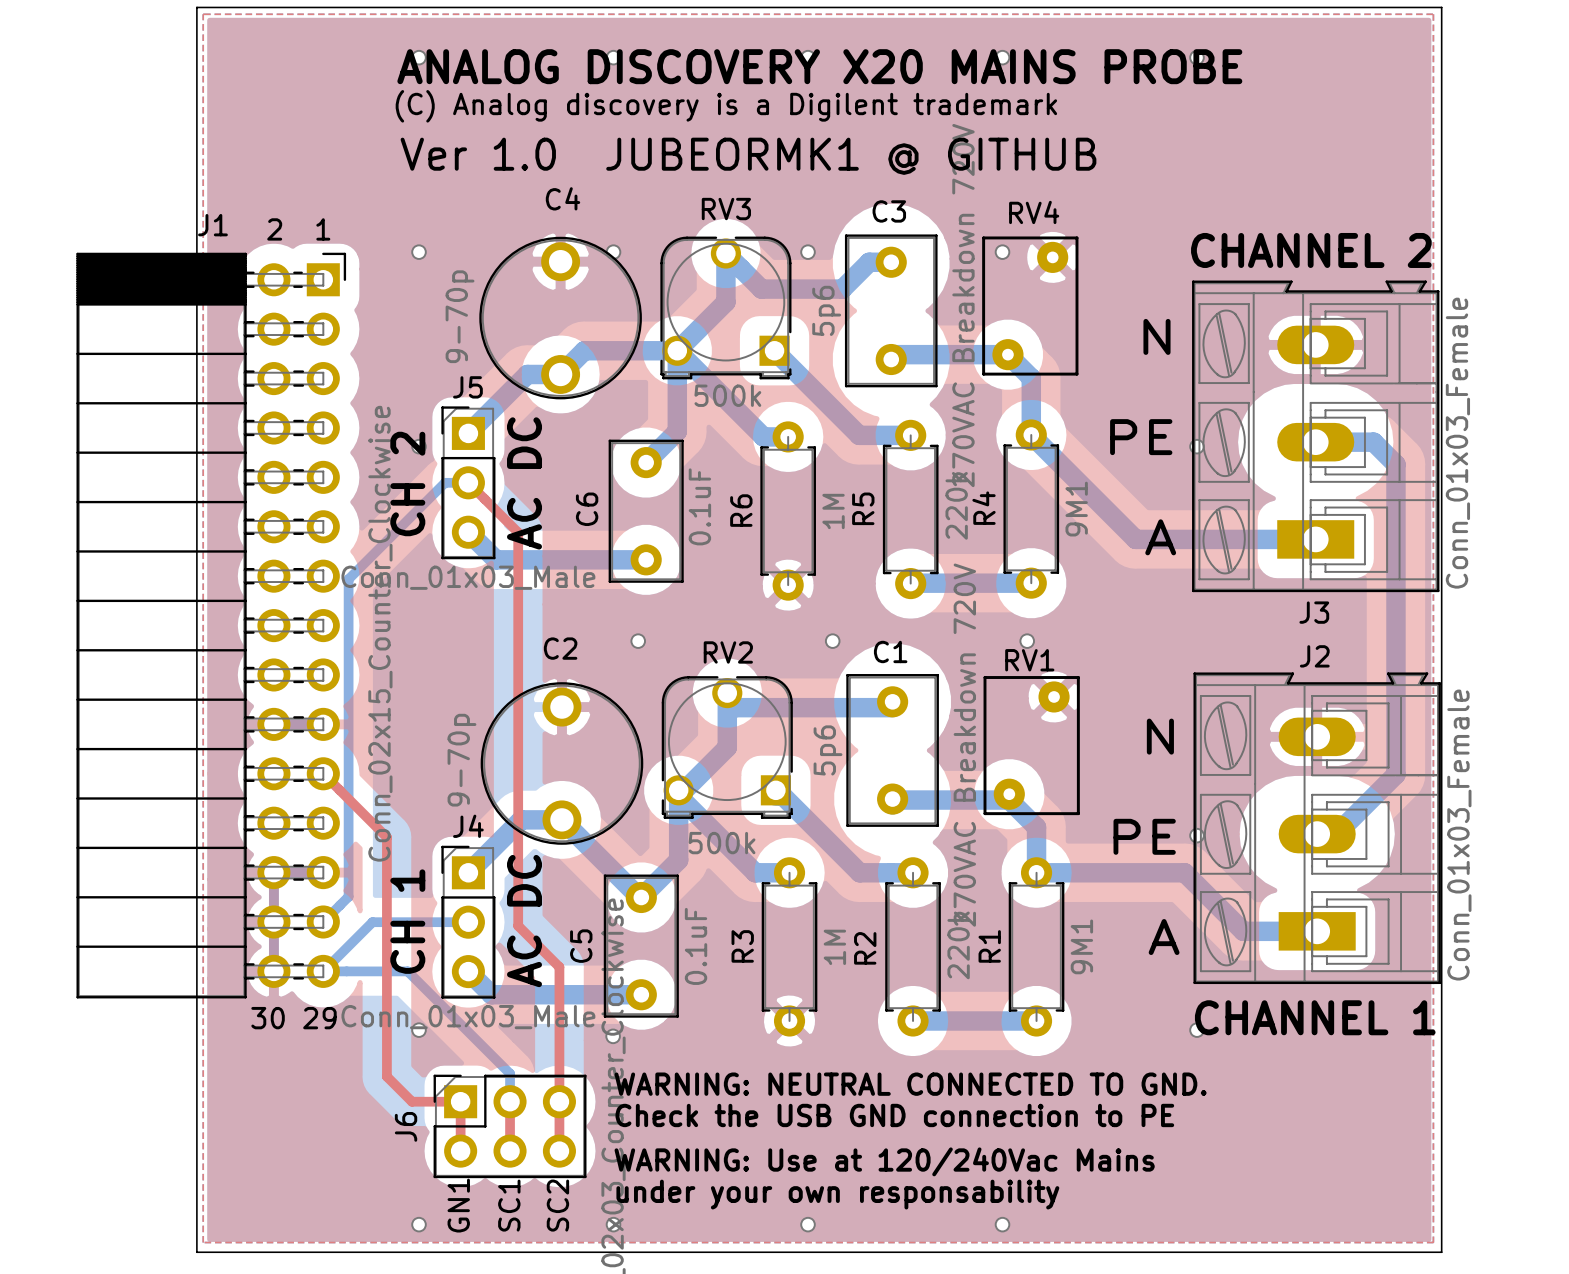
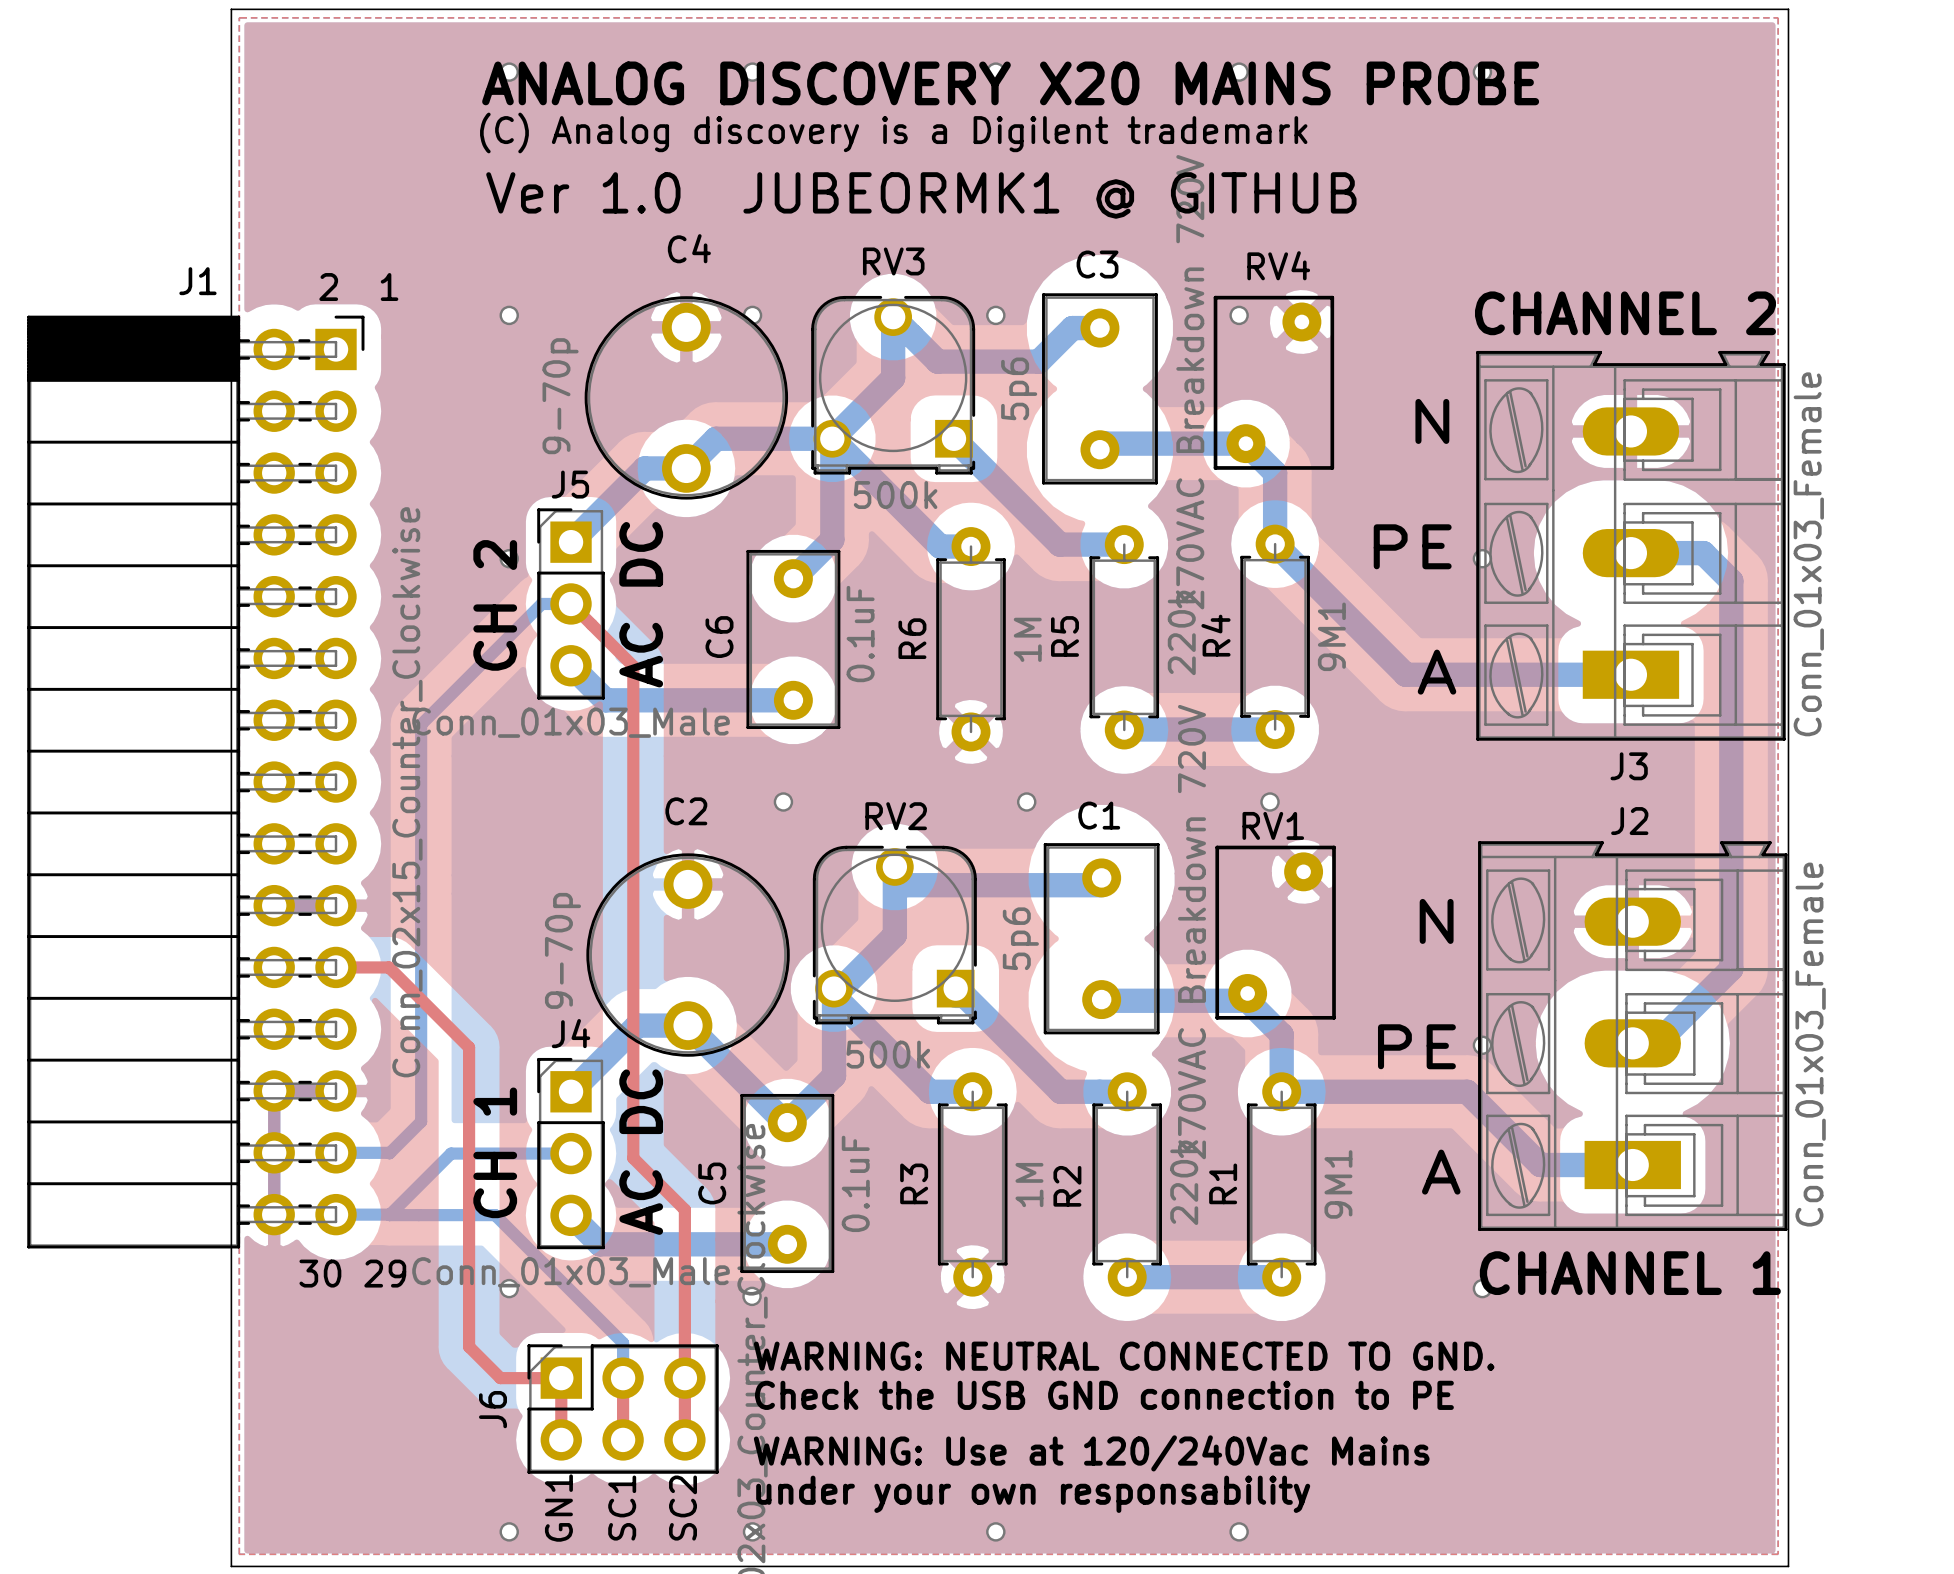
J1 position: (211, 625) -> (195, 782)
top track: none -> (336, 967) (389, 967)
bottom track: none -> (336, 1152) (389, 1153)
bottom track: none -> (336, 1214) (389, 1215)

